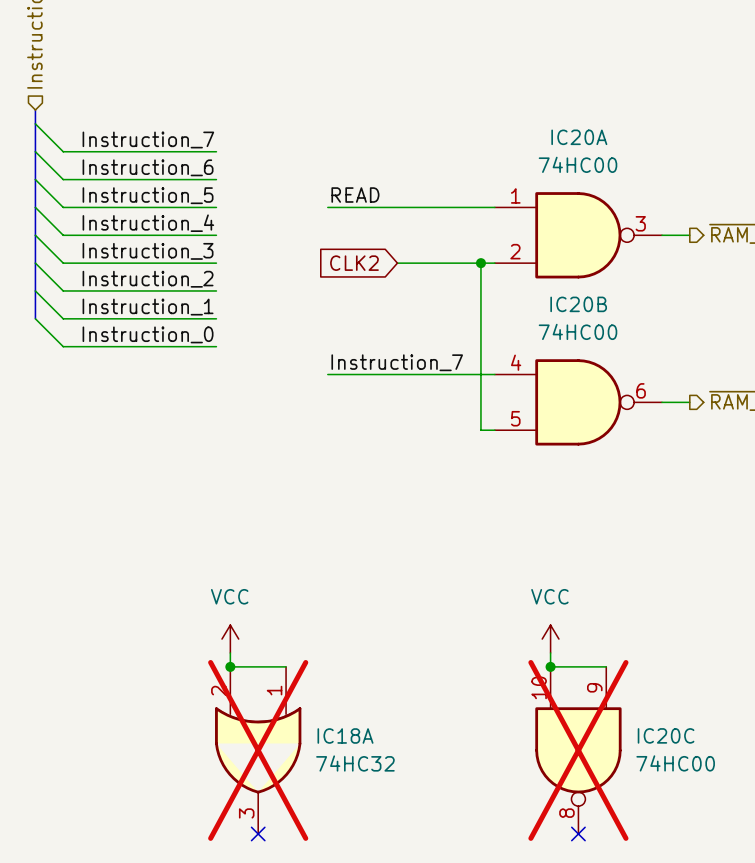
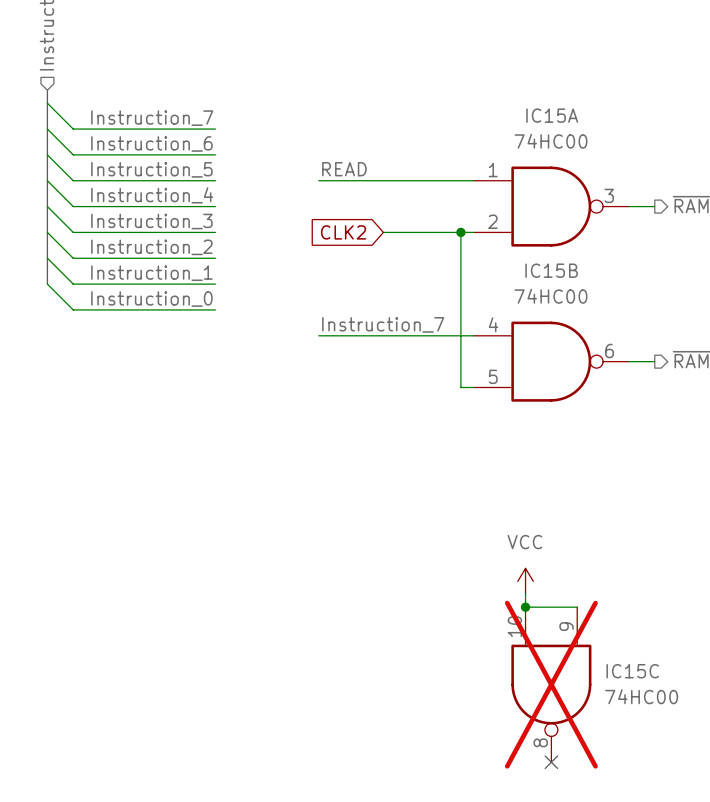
IC20A name: IC20A (579, 137) -> IC15A (552, 115)
IC20B name: IC20B (578, 304) -> IC15B (551, 270)
power symbol: VCC (230, 639) -> none
wire: (230, 652) (230, 666) (286, 666) -> none
junction: (230, 666) -> none
IC20C name: IC20C (666, 735) -> IC15C (632, 671)
IC18A: 74HC32 (258, 750) -> none
no-connect mark: (258, 833) -> none

